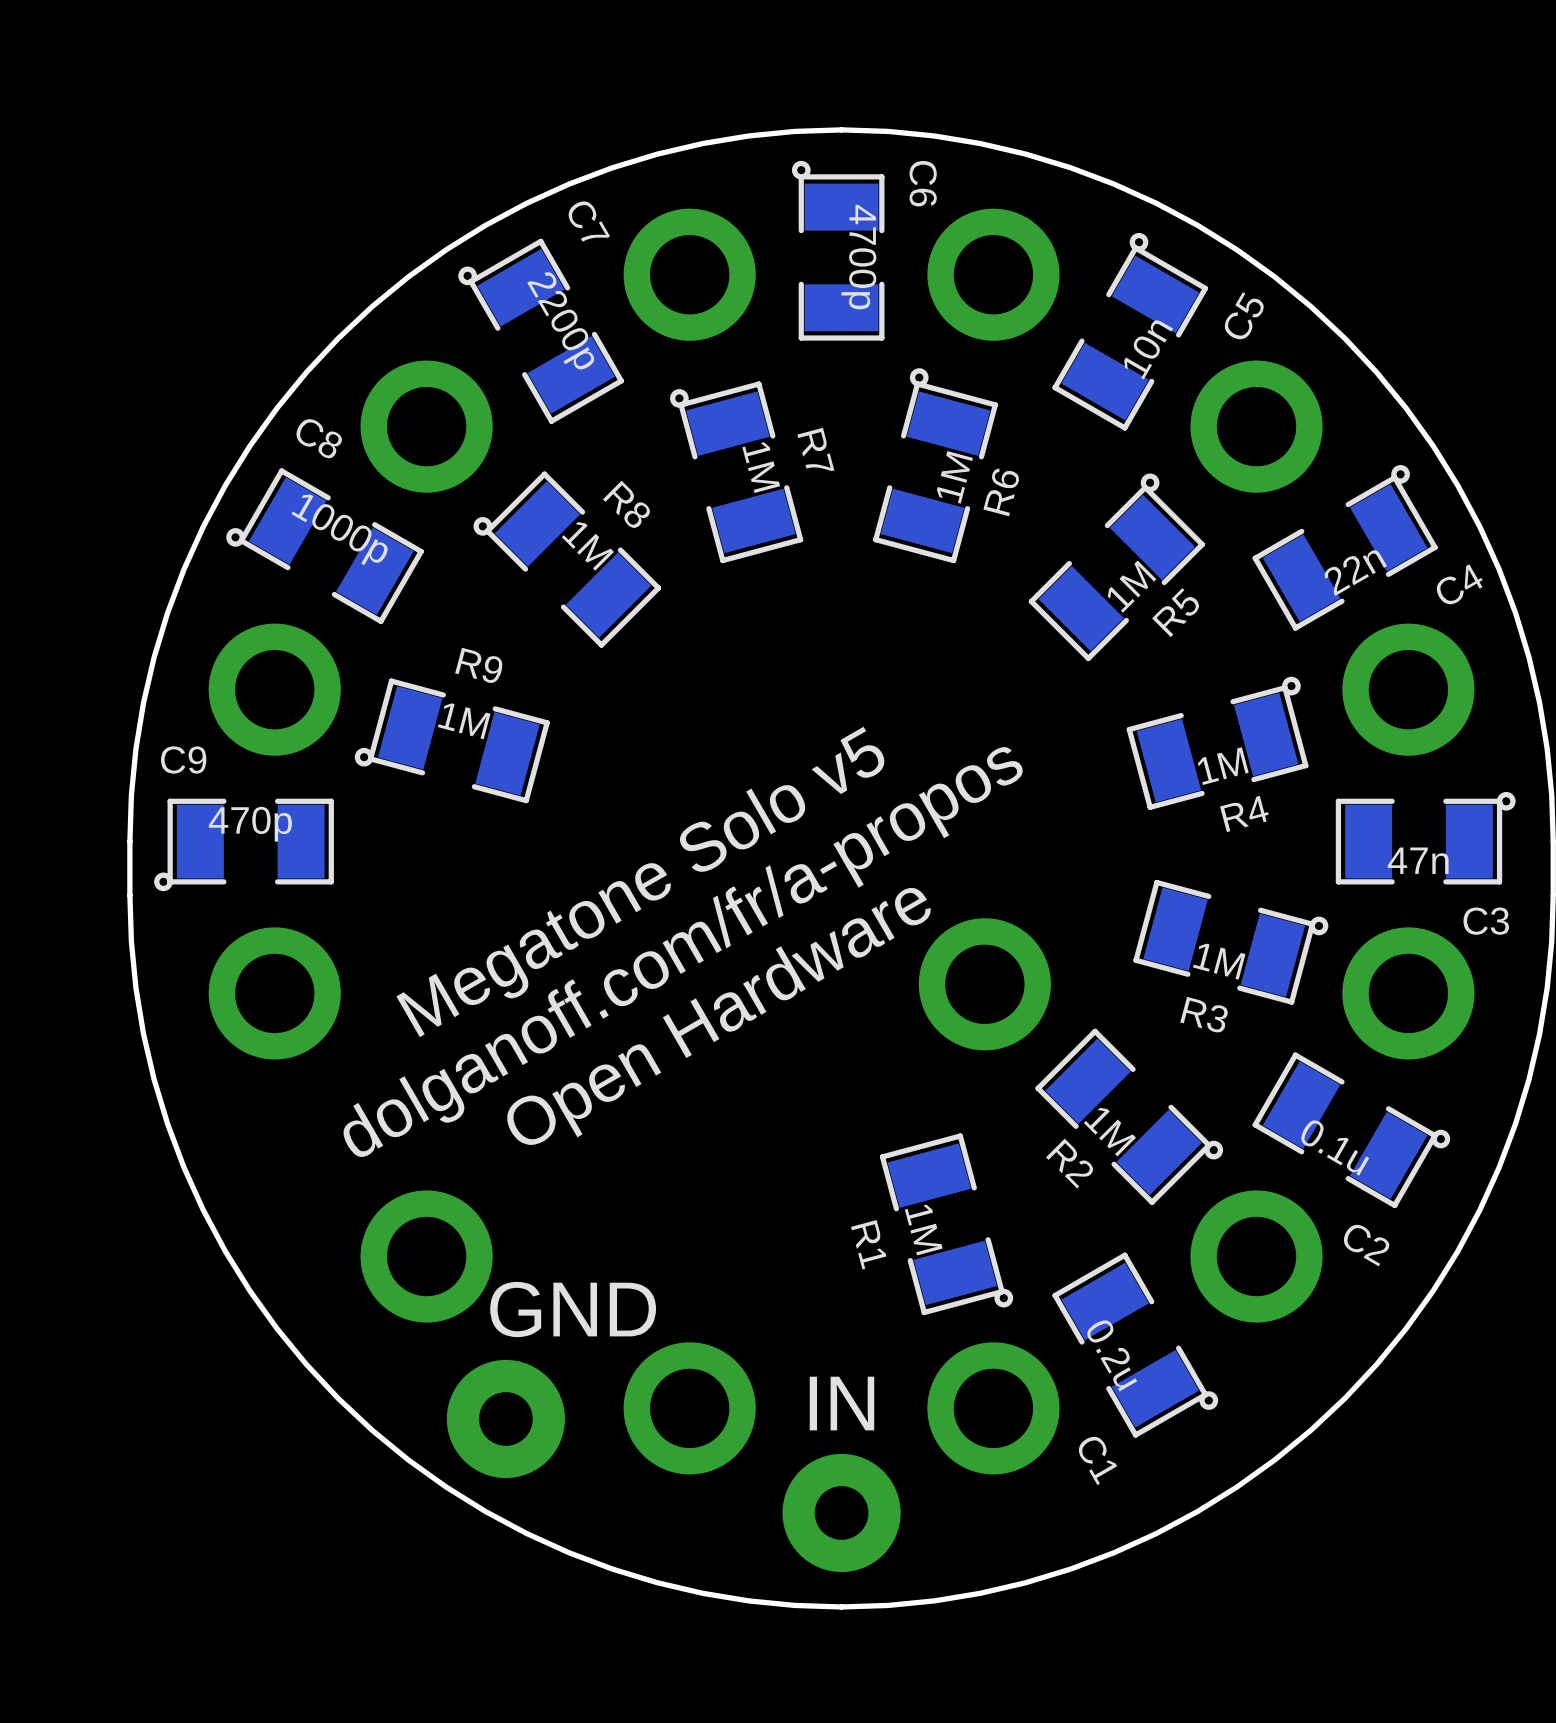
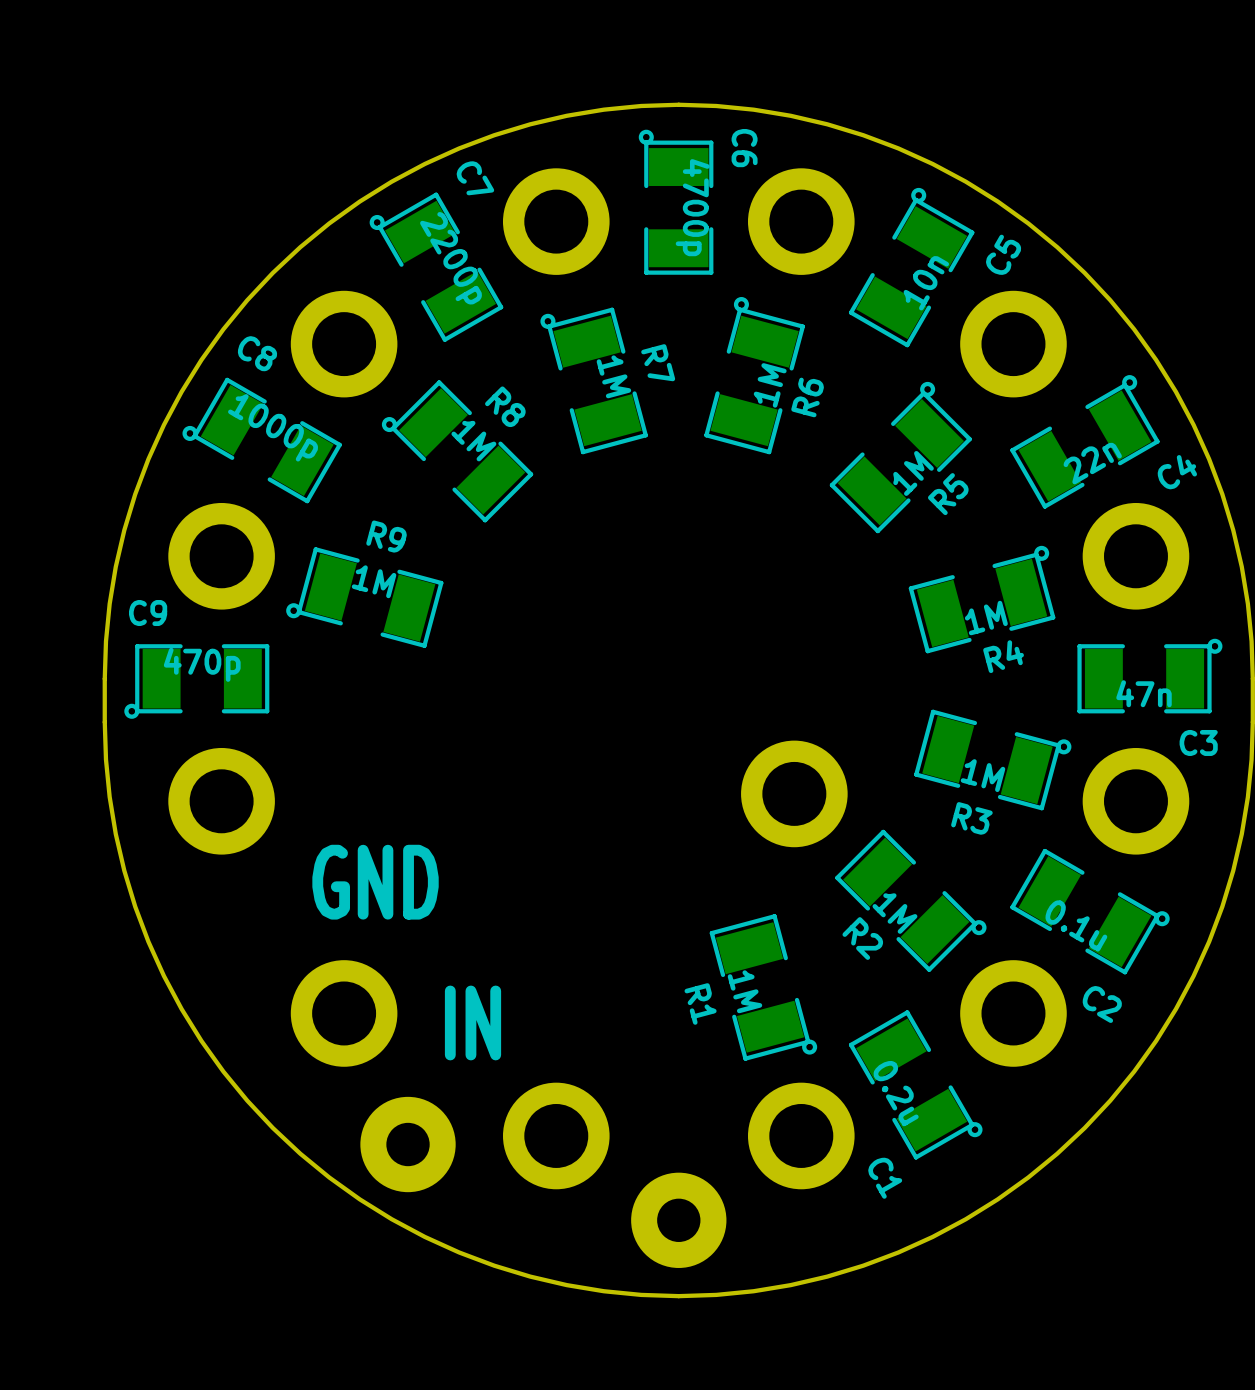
text: Megatone Solo v5 (640, 881) -> none
text: dolganoff.com/fr/a-propos (681, 952) -> none
text: Open Hardware (718, 1013) -> none
text: none -> GND (375, 882)
text: GND (573, 1309) -> IN (473, 1022)
text: IN (841, 1403) -> none

